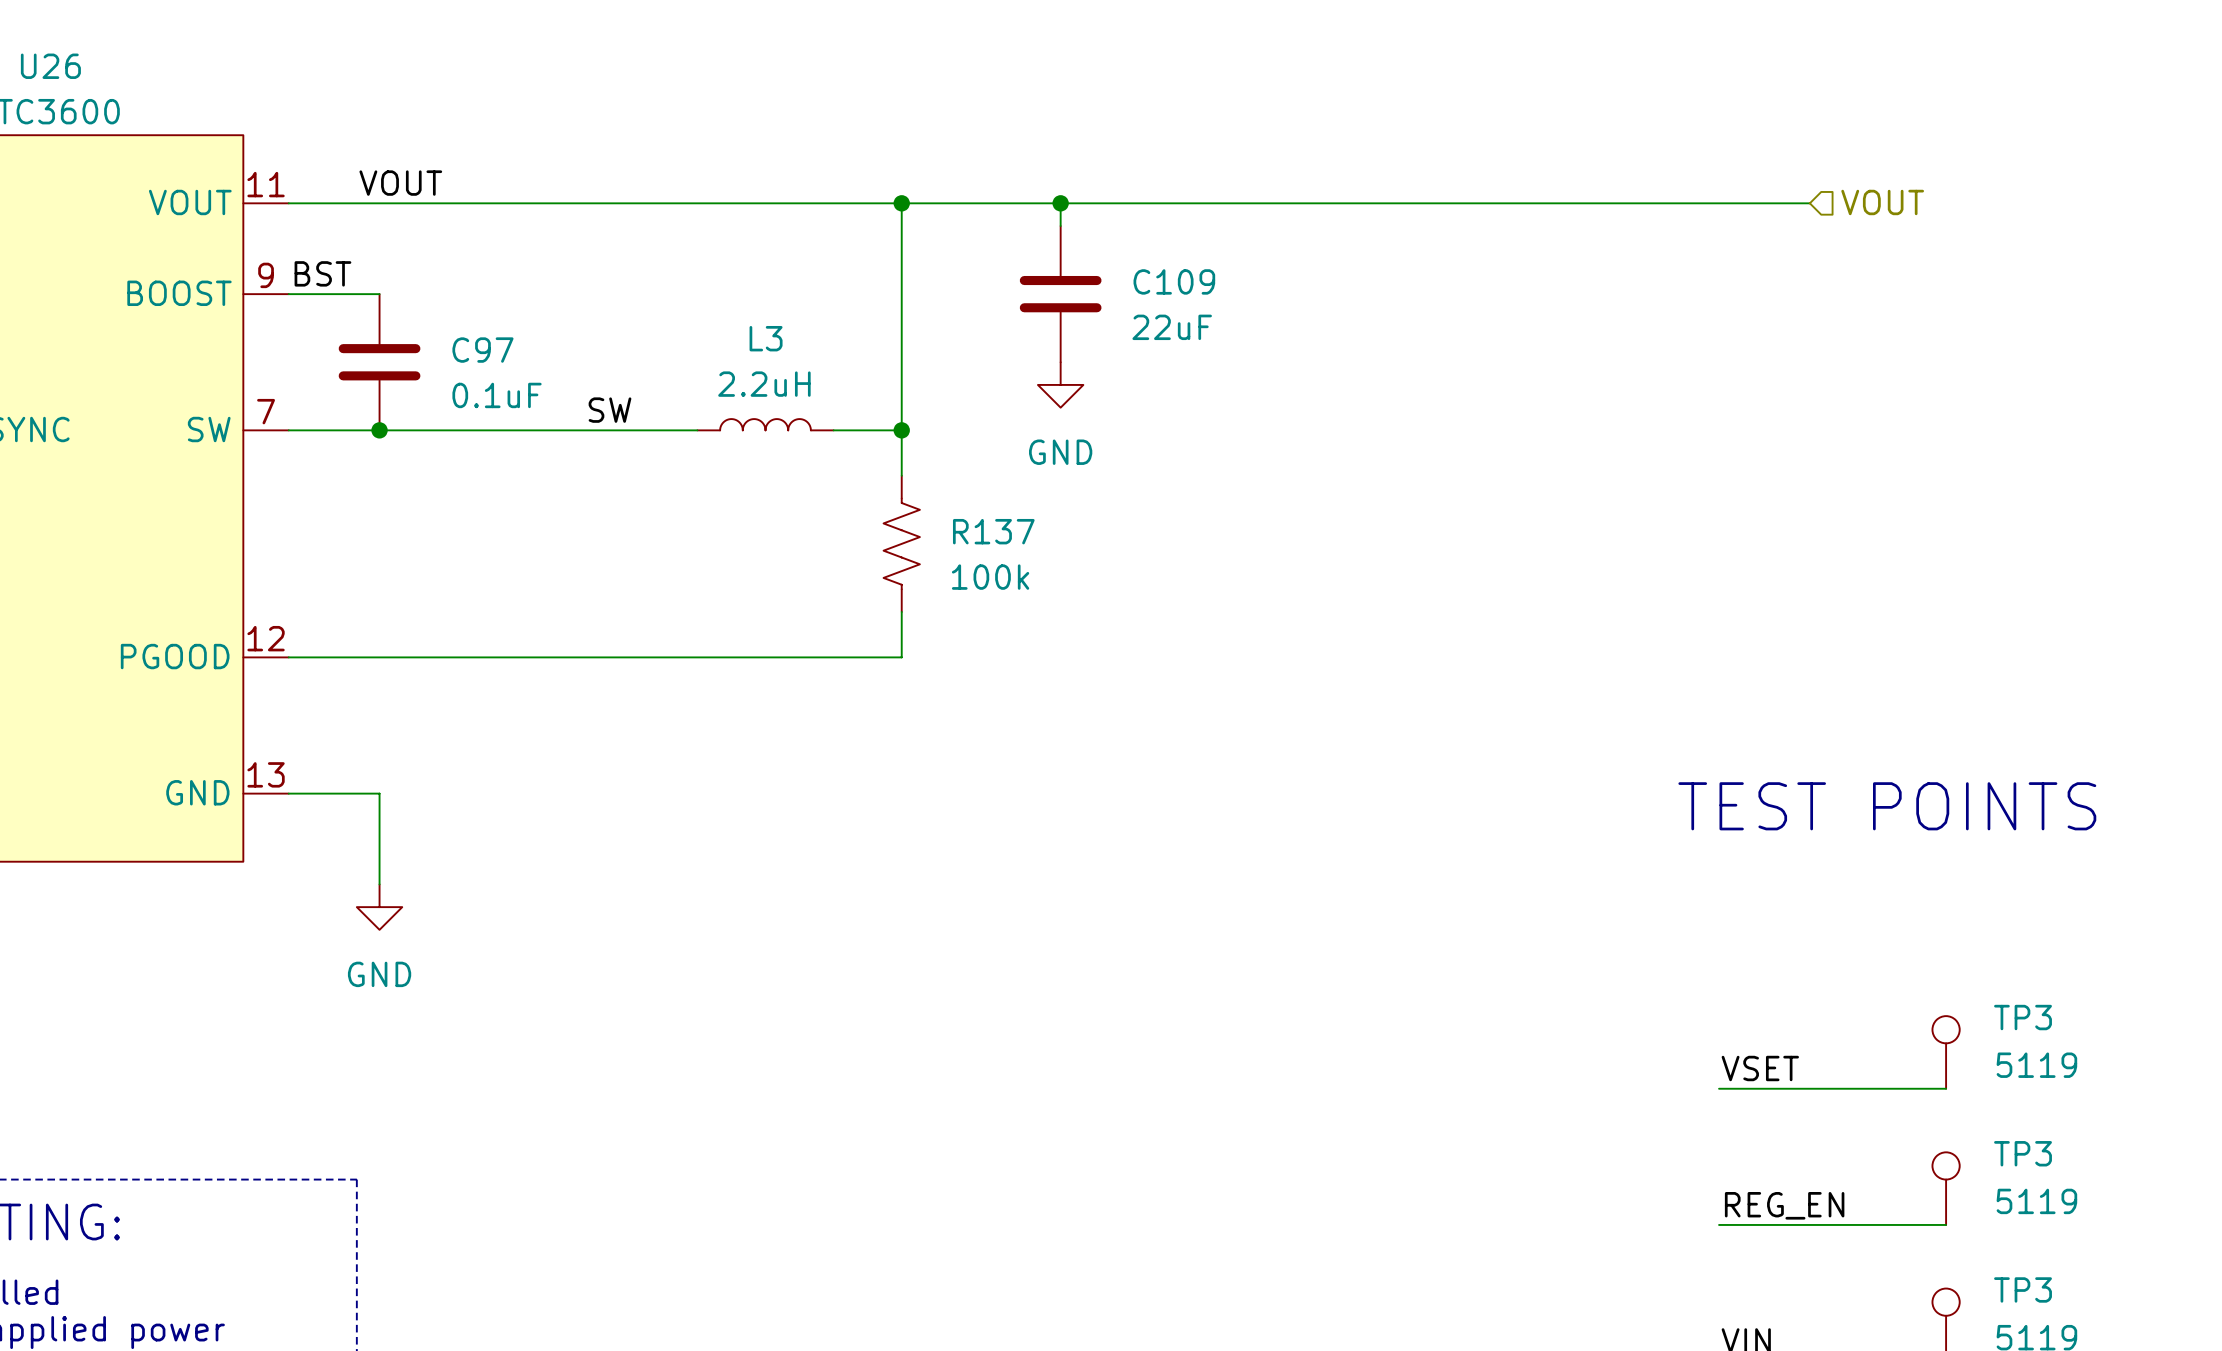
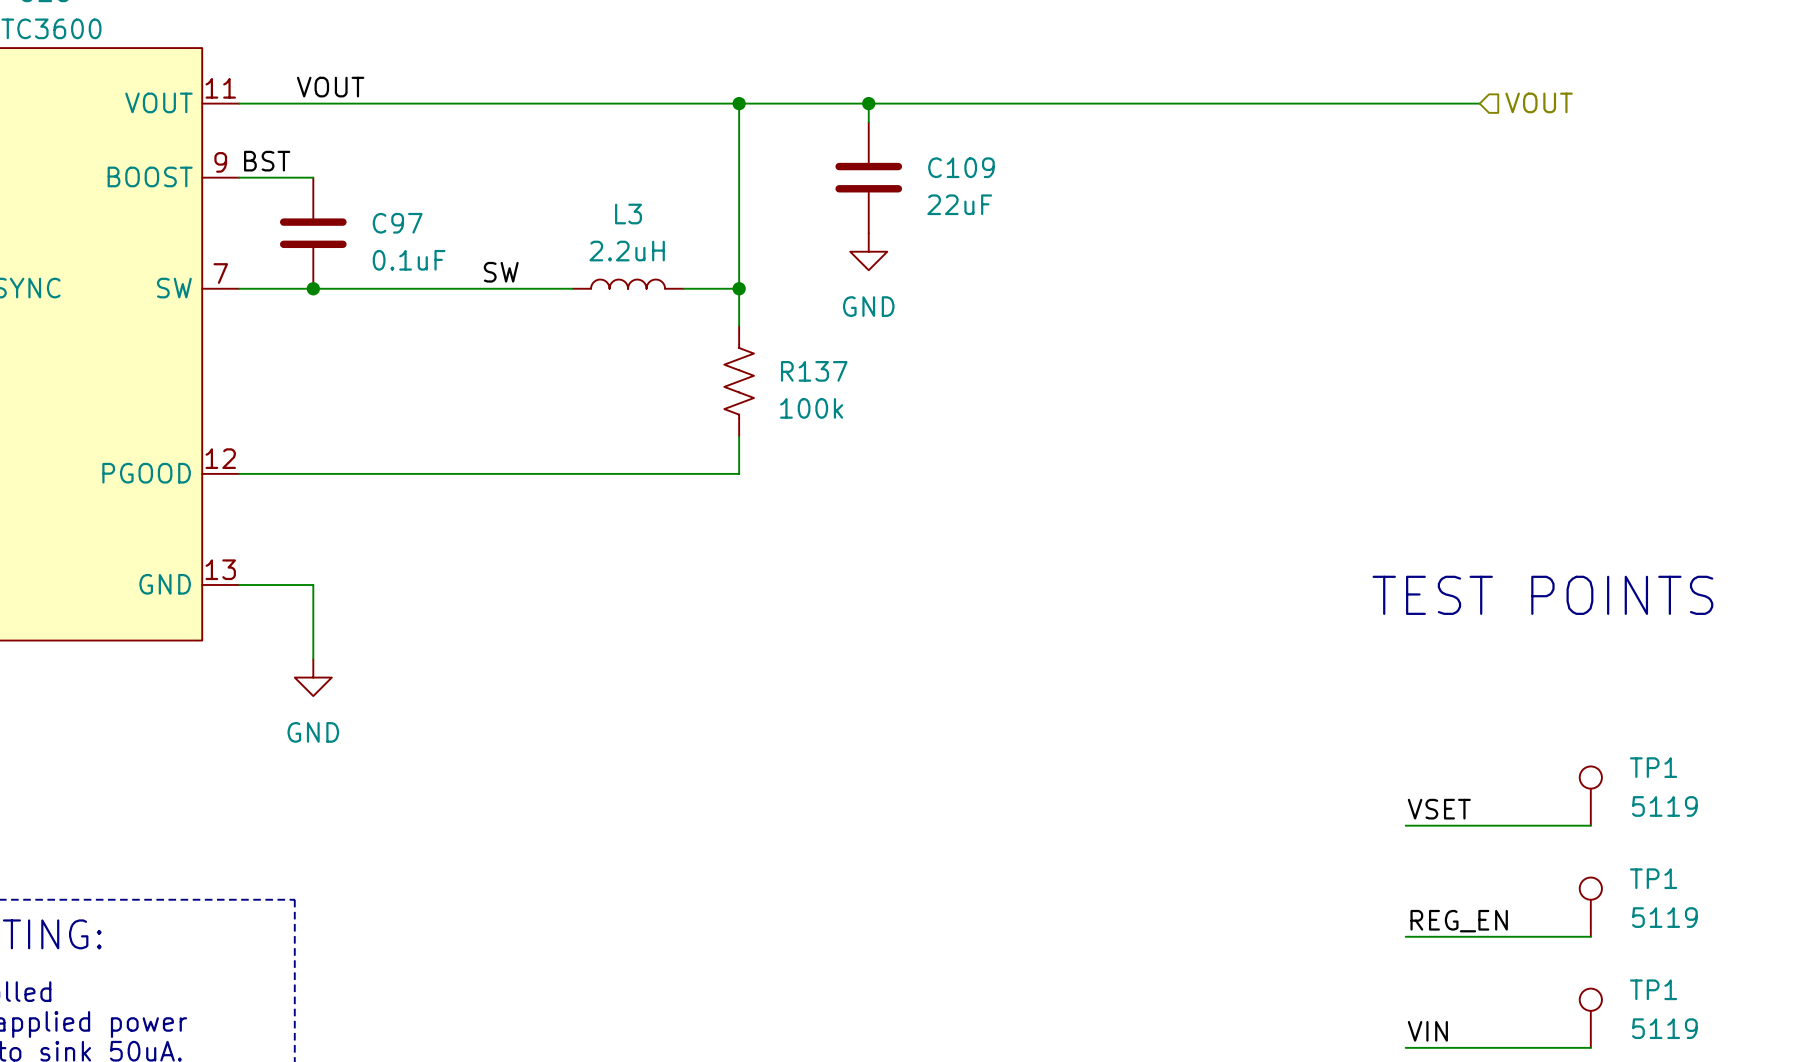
TP3 name: TP3 (2023, 1017) -> TP1 (1653, 767)
TP3 name: TP3 (2023, 1153) -> TP1 (1653, 878)
TP3 name: TP3 (2023, 1289) -> TP1 (1653, 989)

